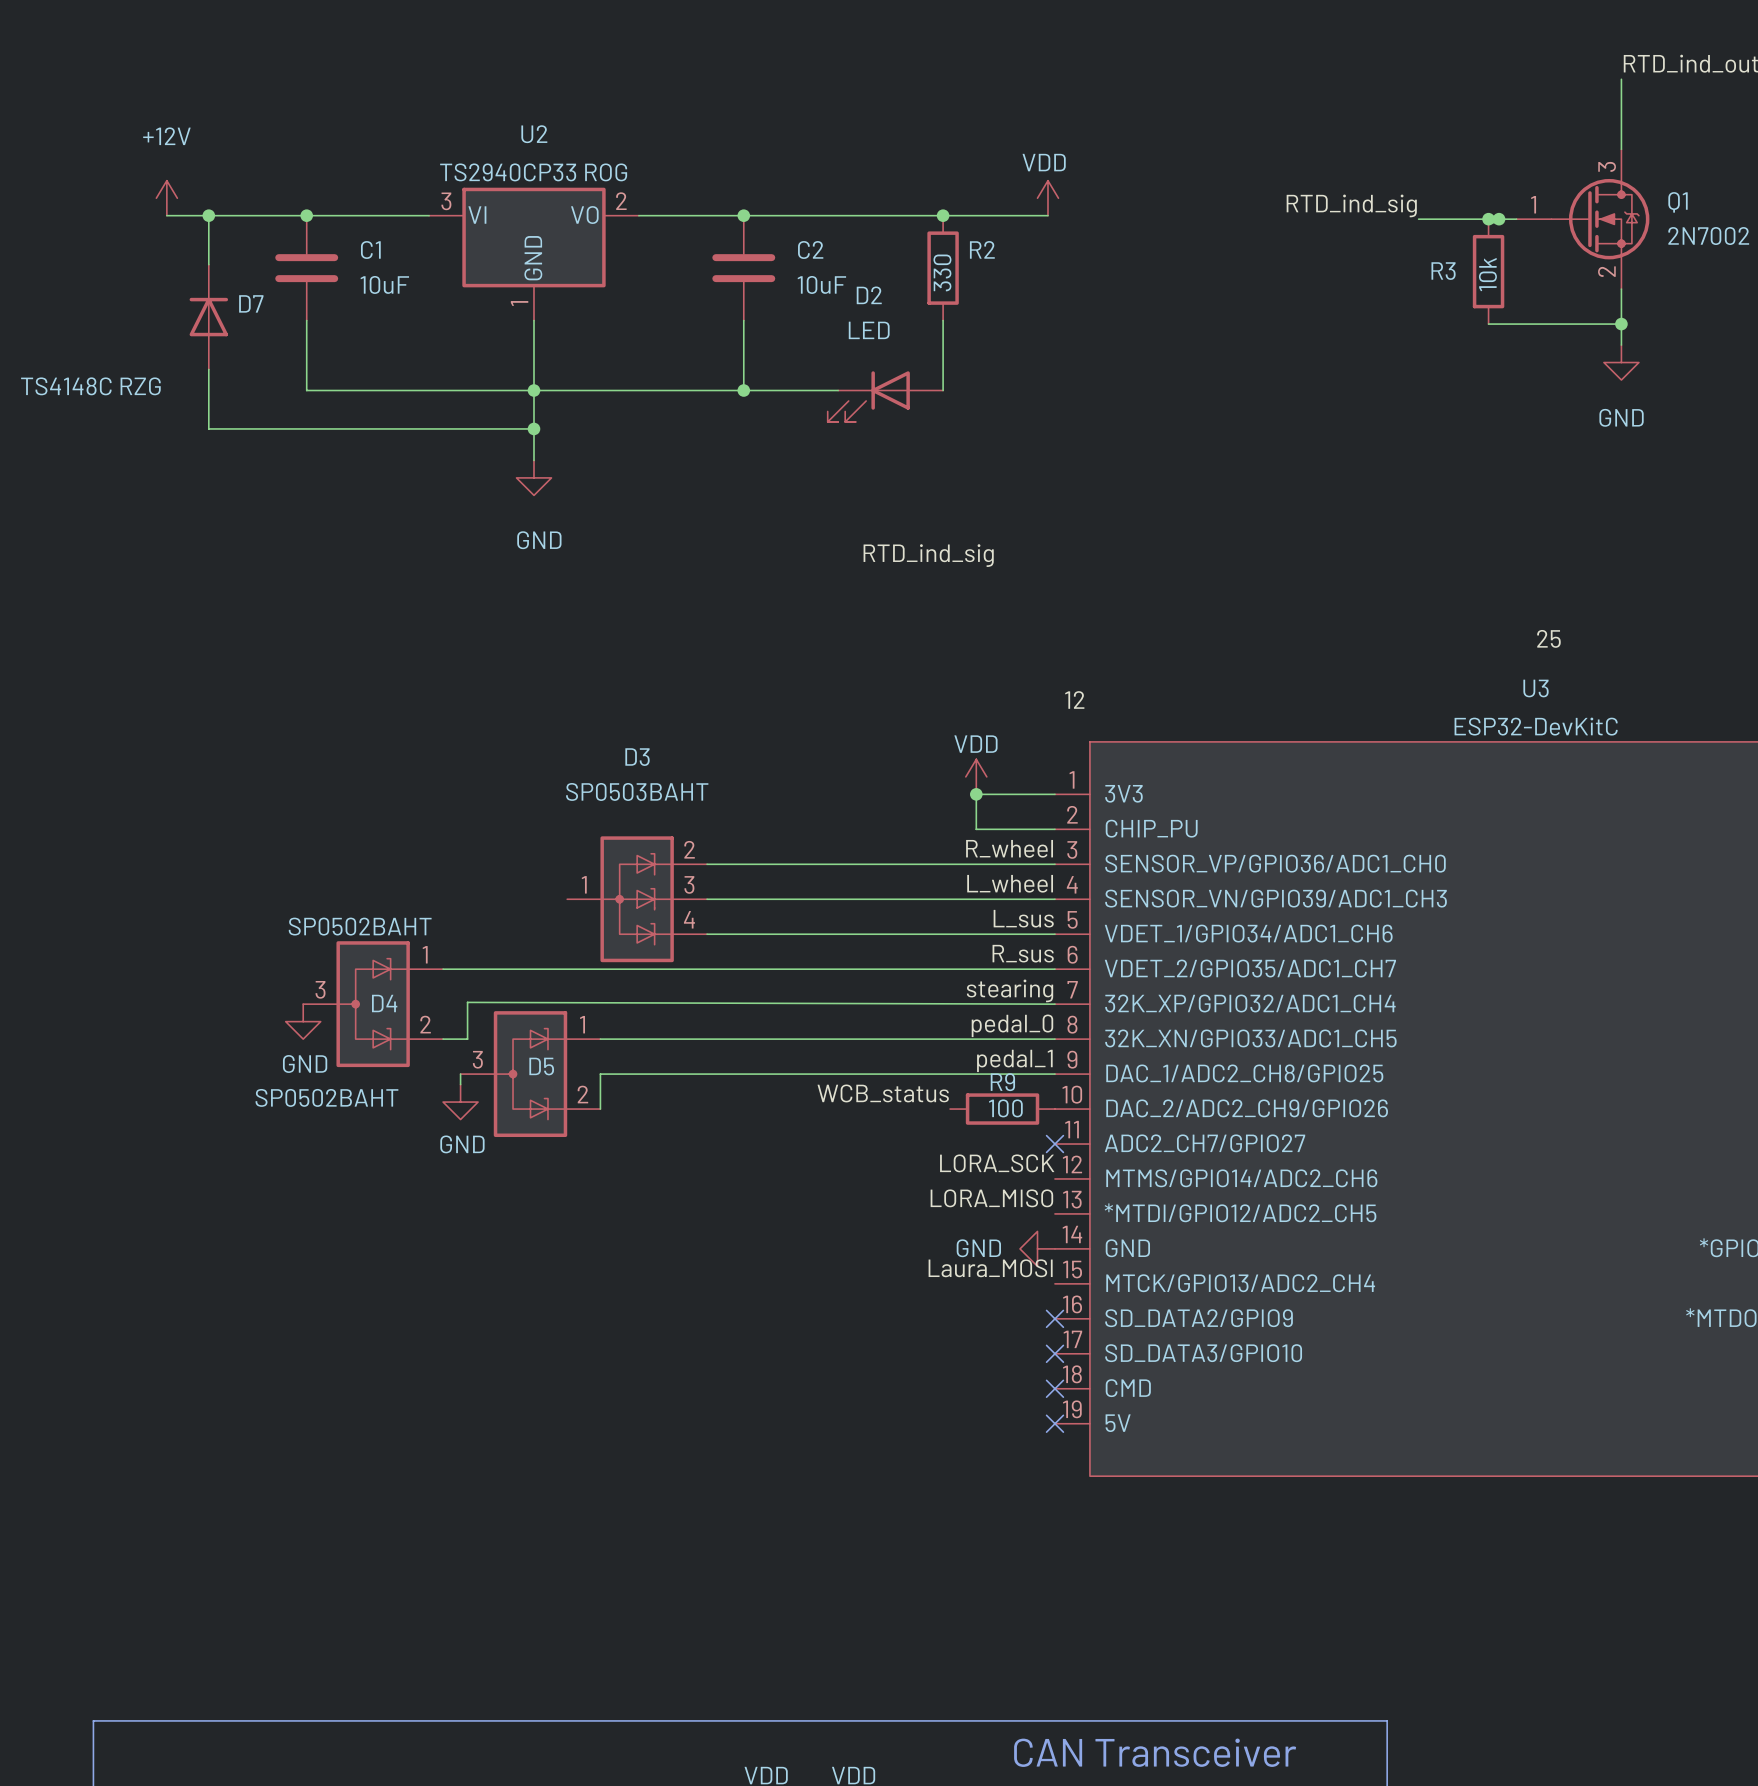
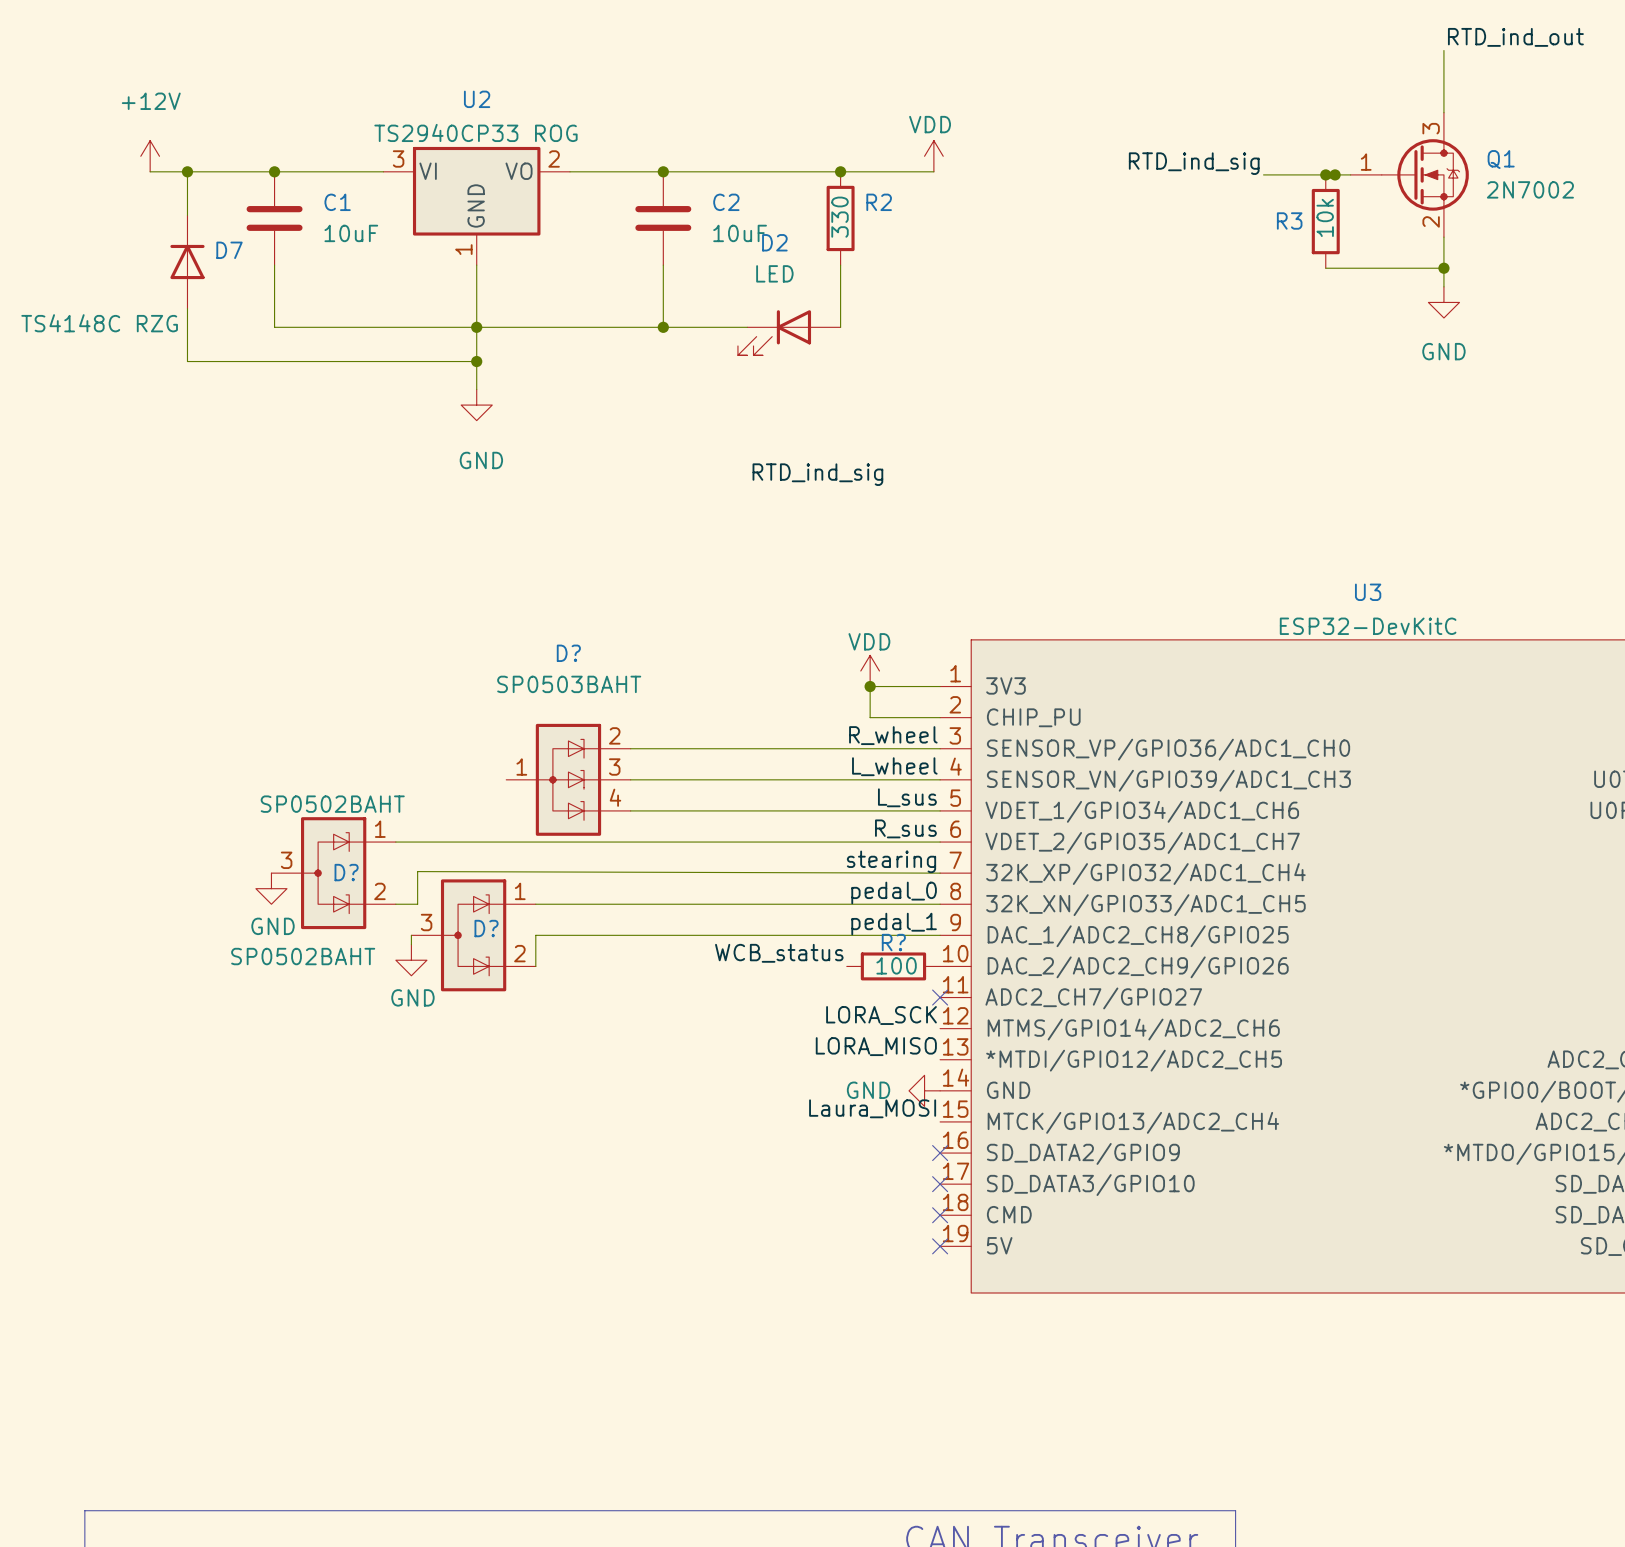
label: 25 (1548, 638) -> none
label: 12 (1074, 699) -> none
D3 name: D3 (637, 757) -> D? (568, 653)
D4 name: D4 (384, 1003) -> D? (346, 872)
D5 name: D5 (541, 1066) -> D? (486, 928)
R9 name: R9 (1002, 1082) -> R? (893, 942)

